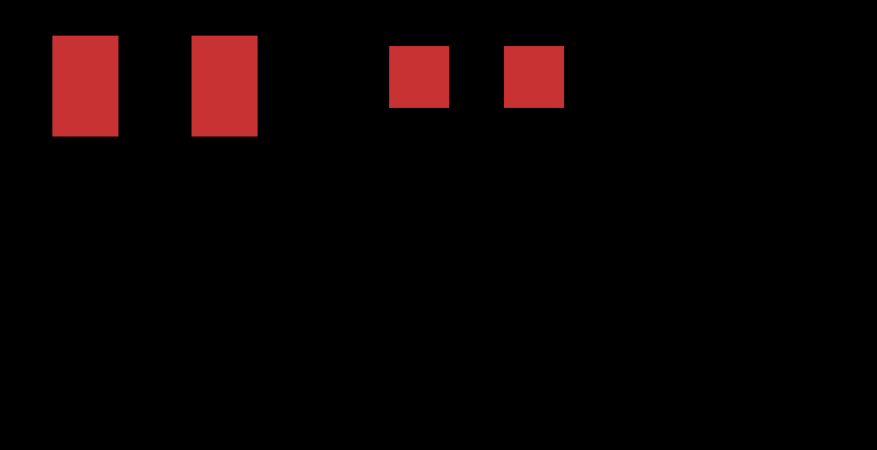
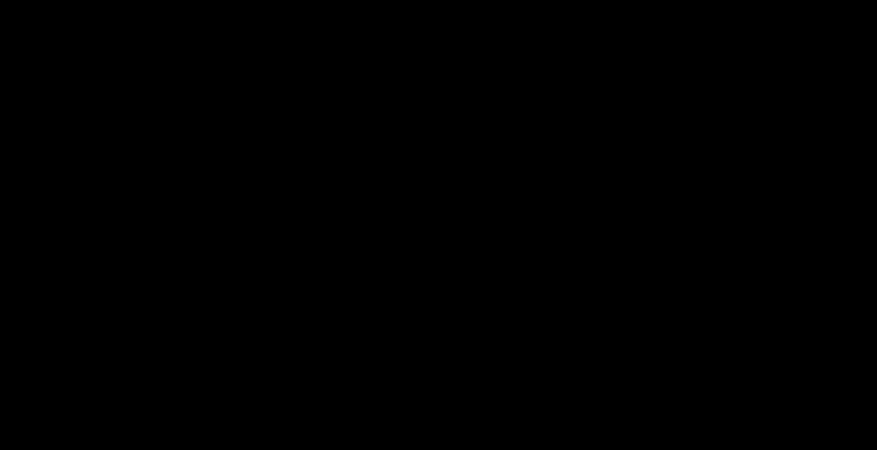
part: (476, 77) -> none
part: (154, 86) -> none

